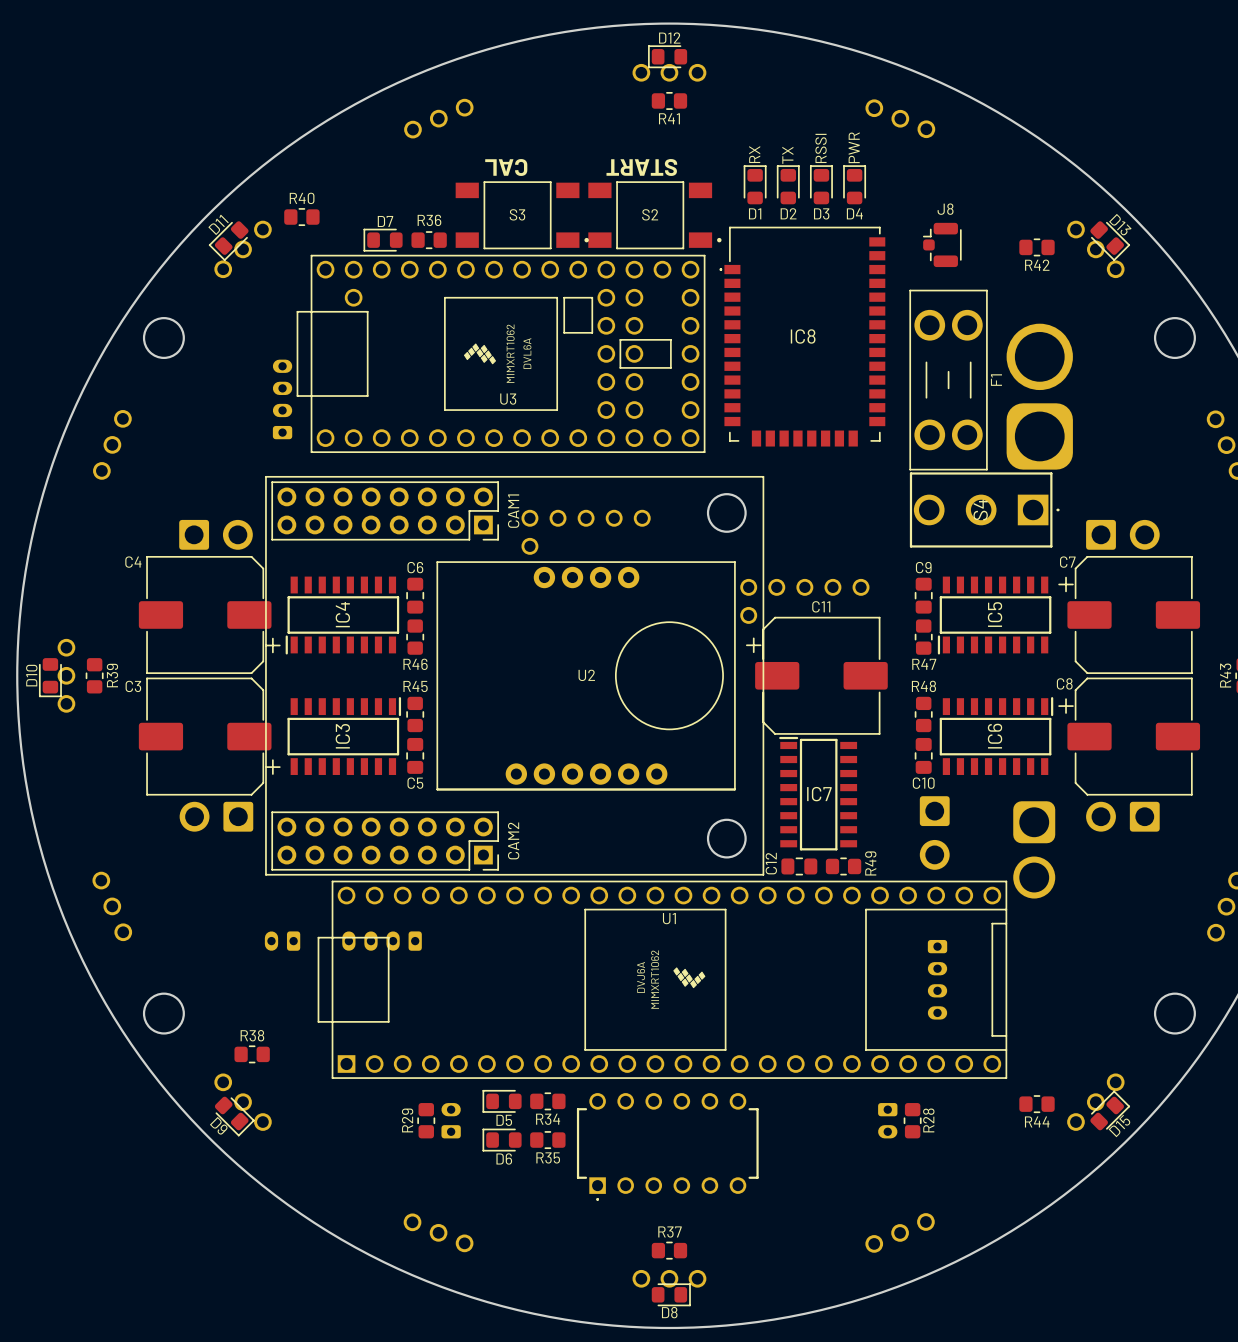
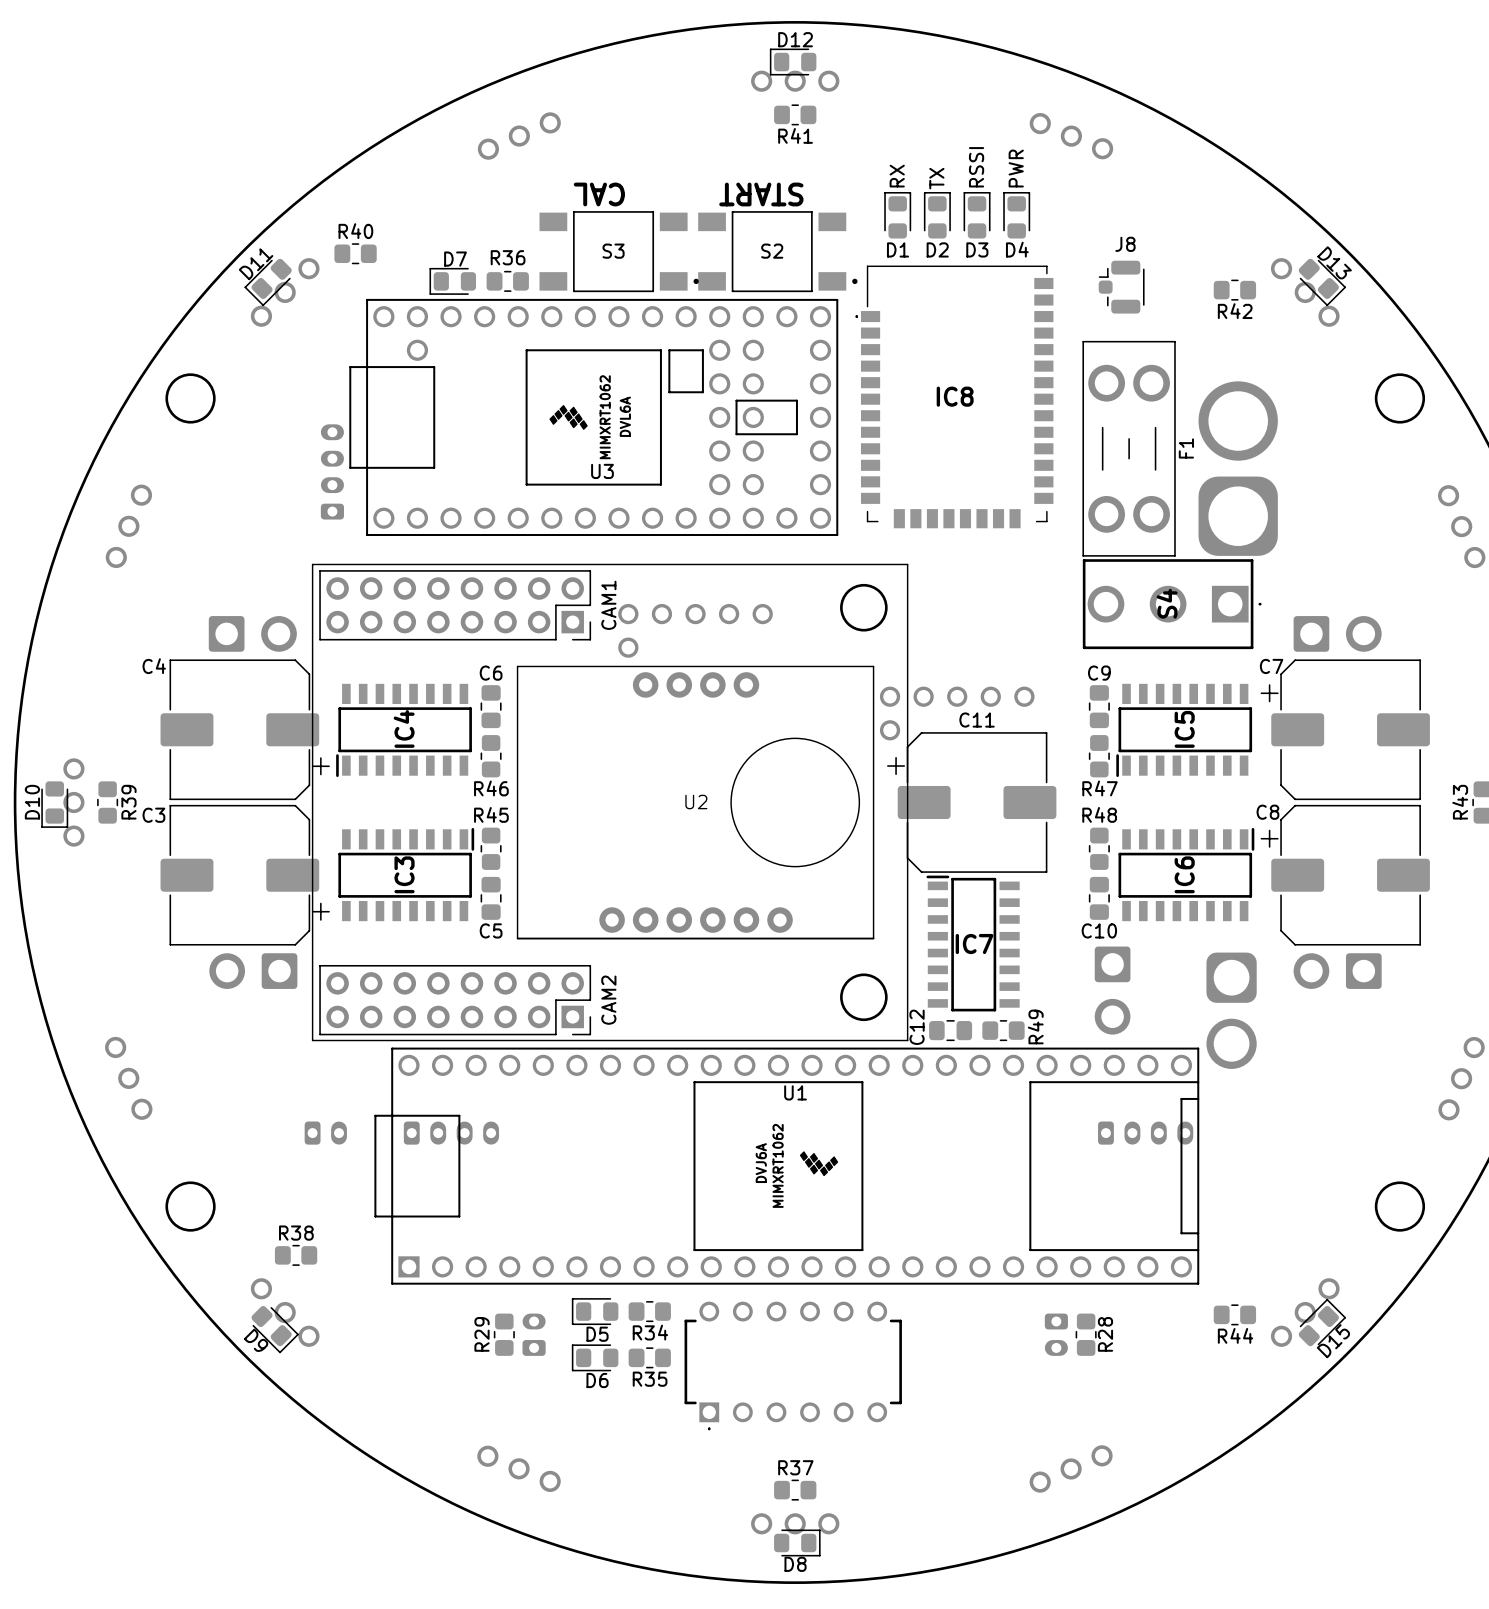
part rotation: 0° (282, 941) -> 180° (325, 1133)
part rotation: 0° (382, 941) -> 180° (451, 1133)
part rotation: 0° (937, 979) -> 90° counterclockwise (1145, 1133)

